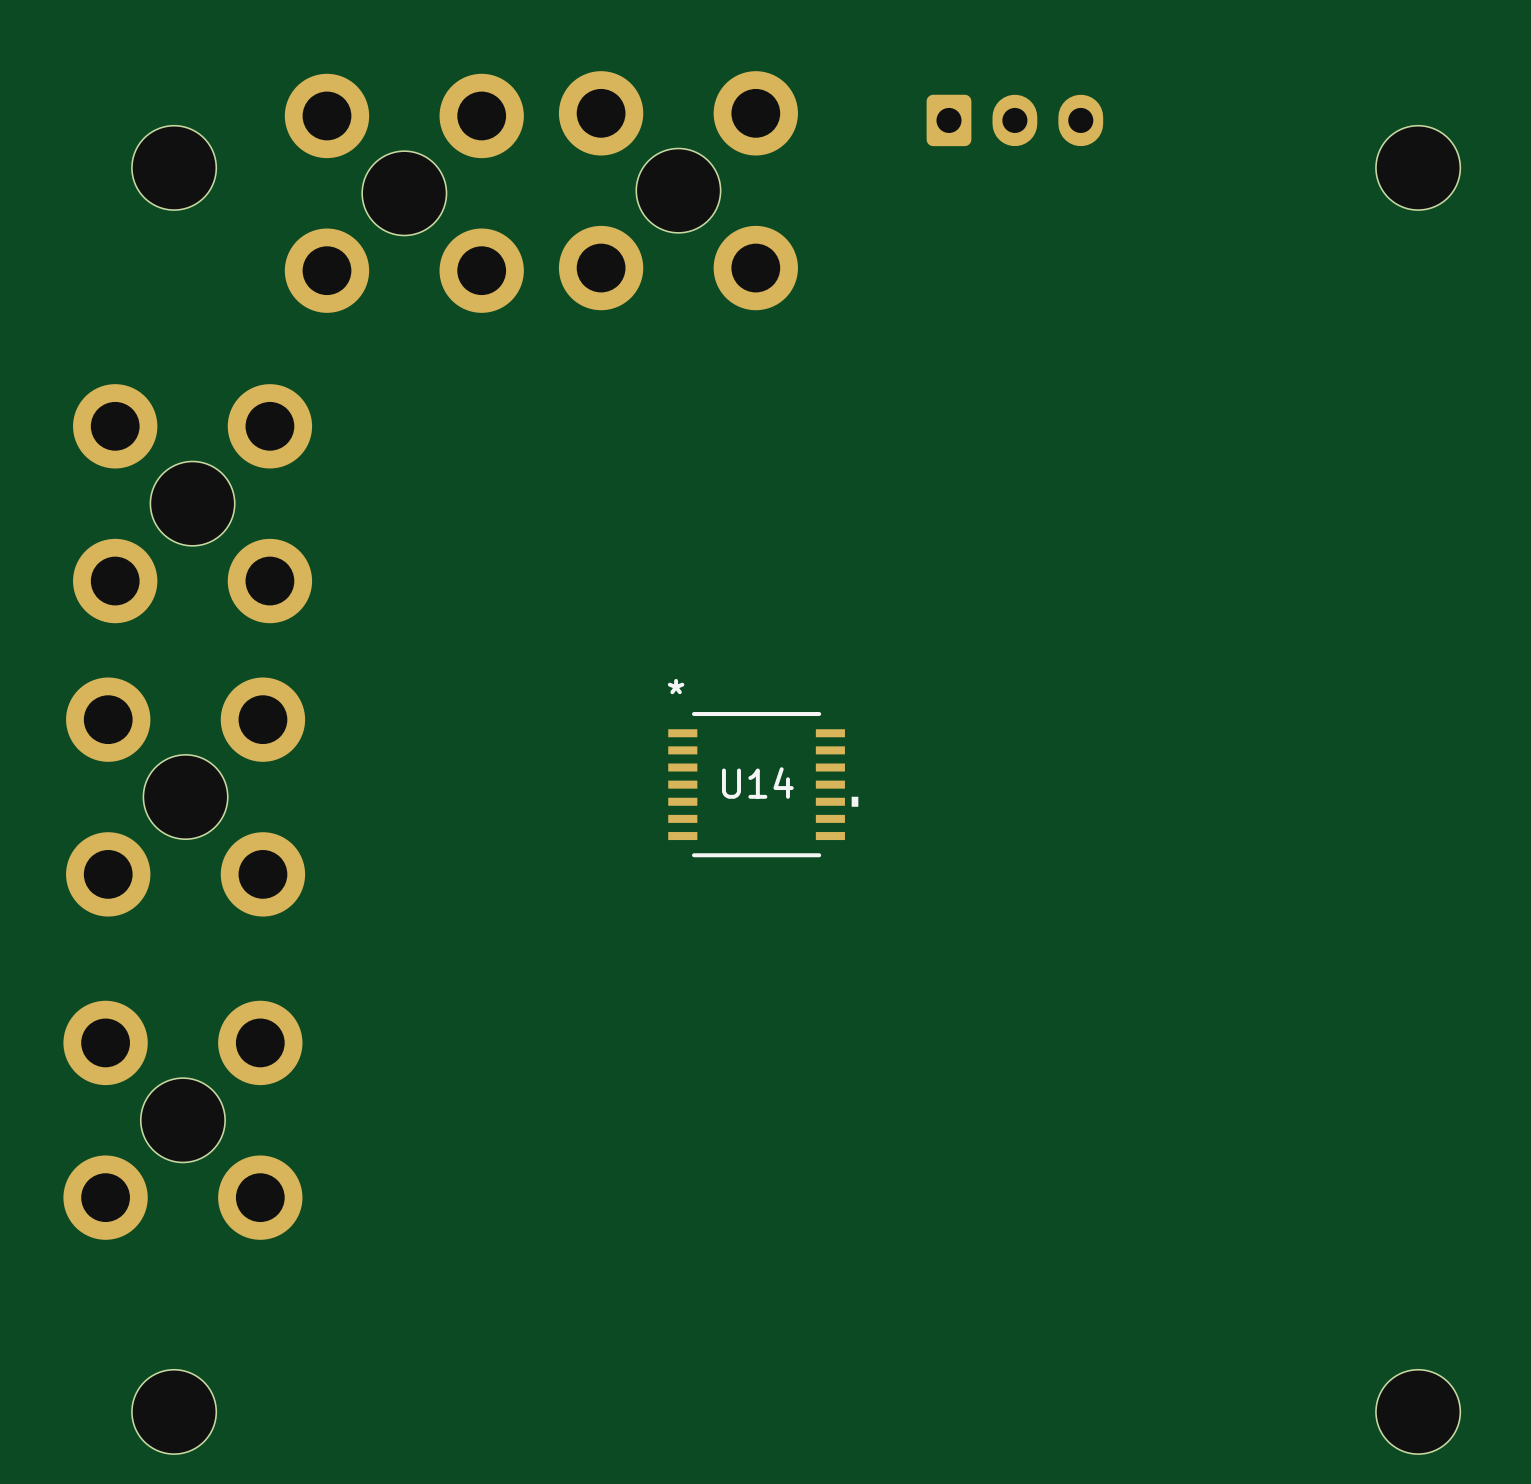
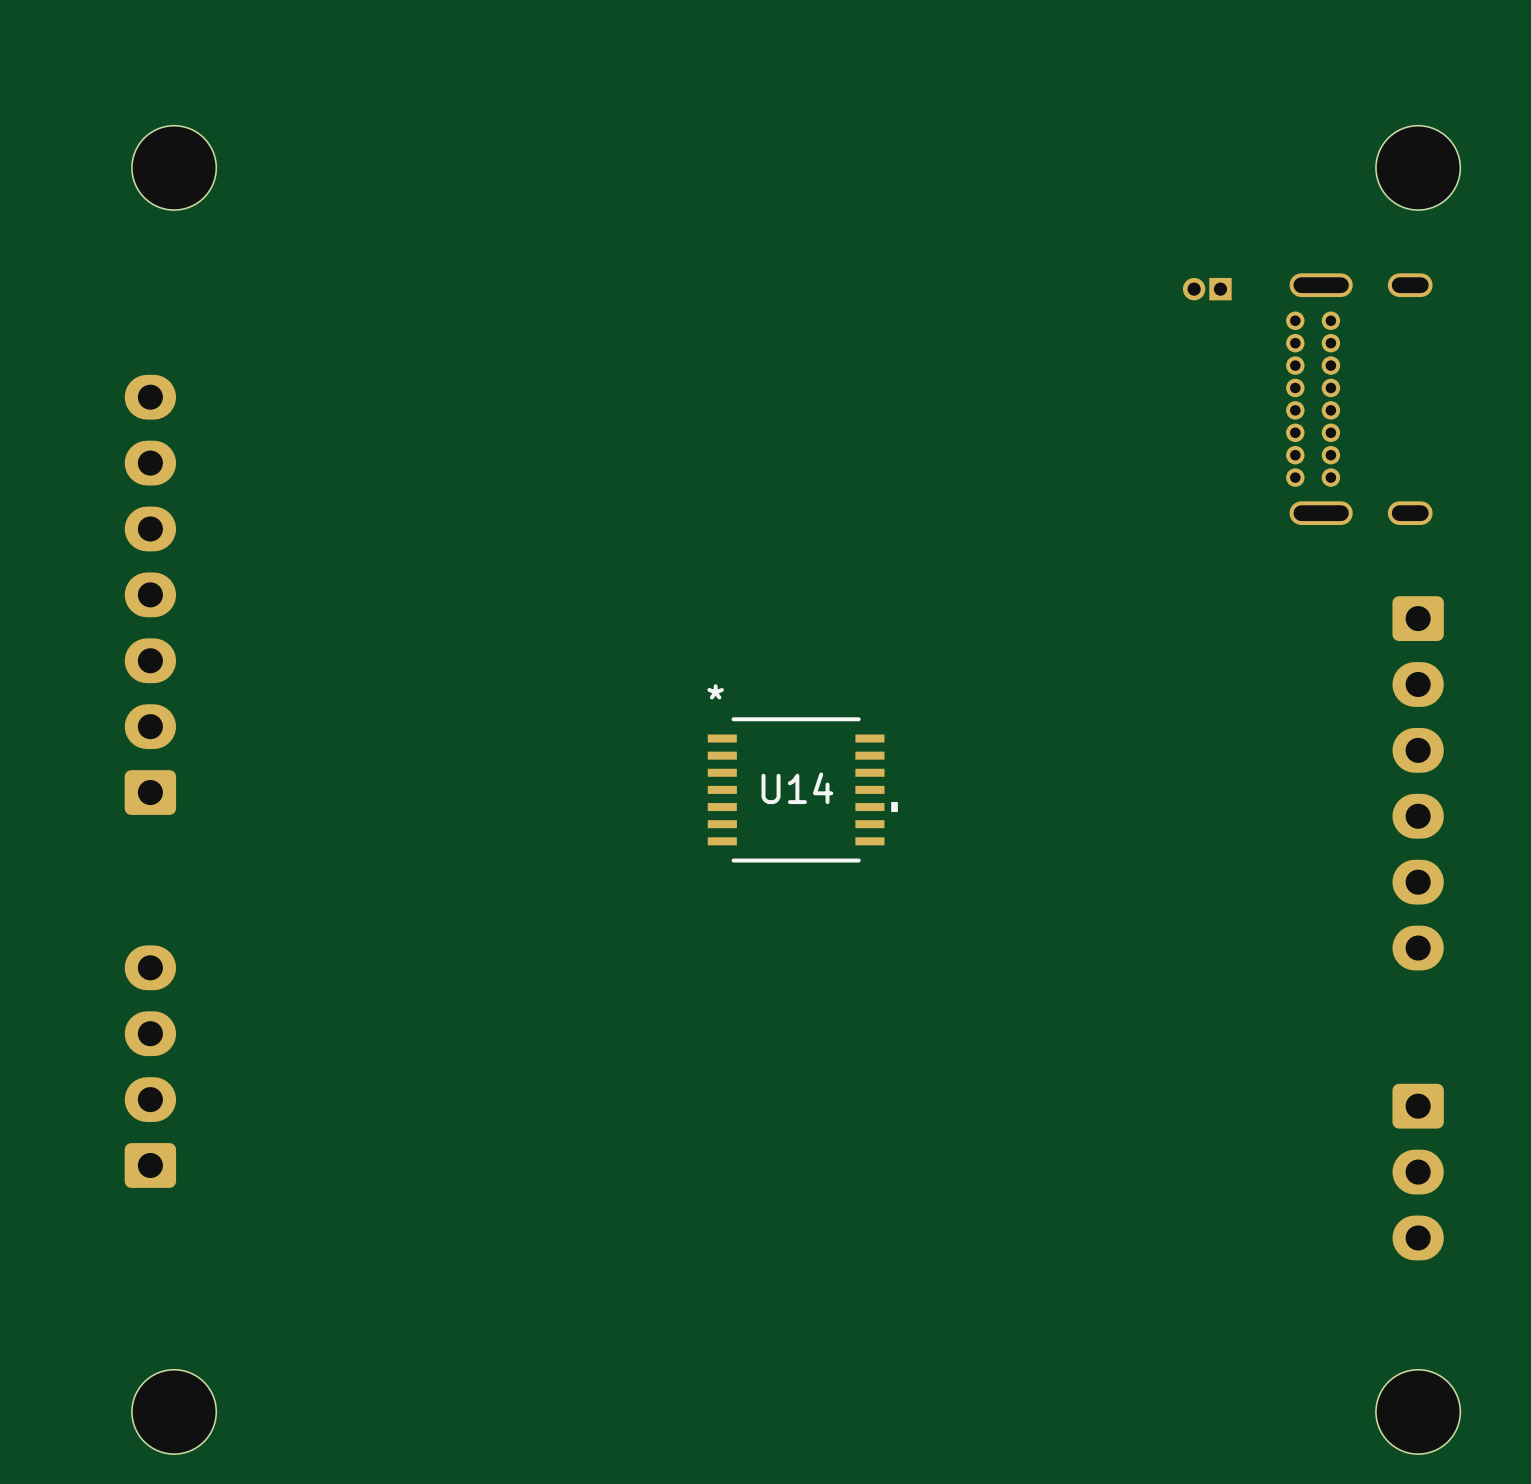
part: (1014, 120) -> none
part: (678, 190) -> none
part: (404, 193) -> none
part: none -> (1207, 289)
part: none -> (1359, 399)
part: (192, 503) -> none
part: none -> (150, 594)
part: none -> (1418, 783)
U14 position: (763, 784) -> (802, 789)
part: (185, 797) -> none
part: none -> (150, 1066)
part: (182, 1120) -> none
part: none -> (1418, 1172)

